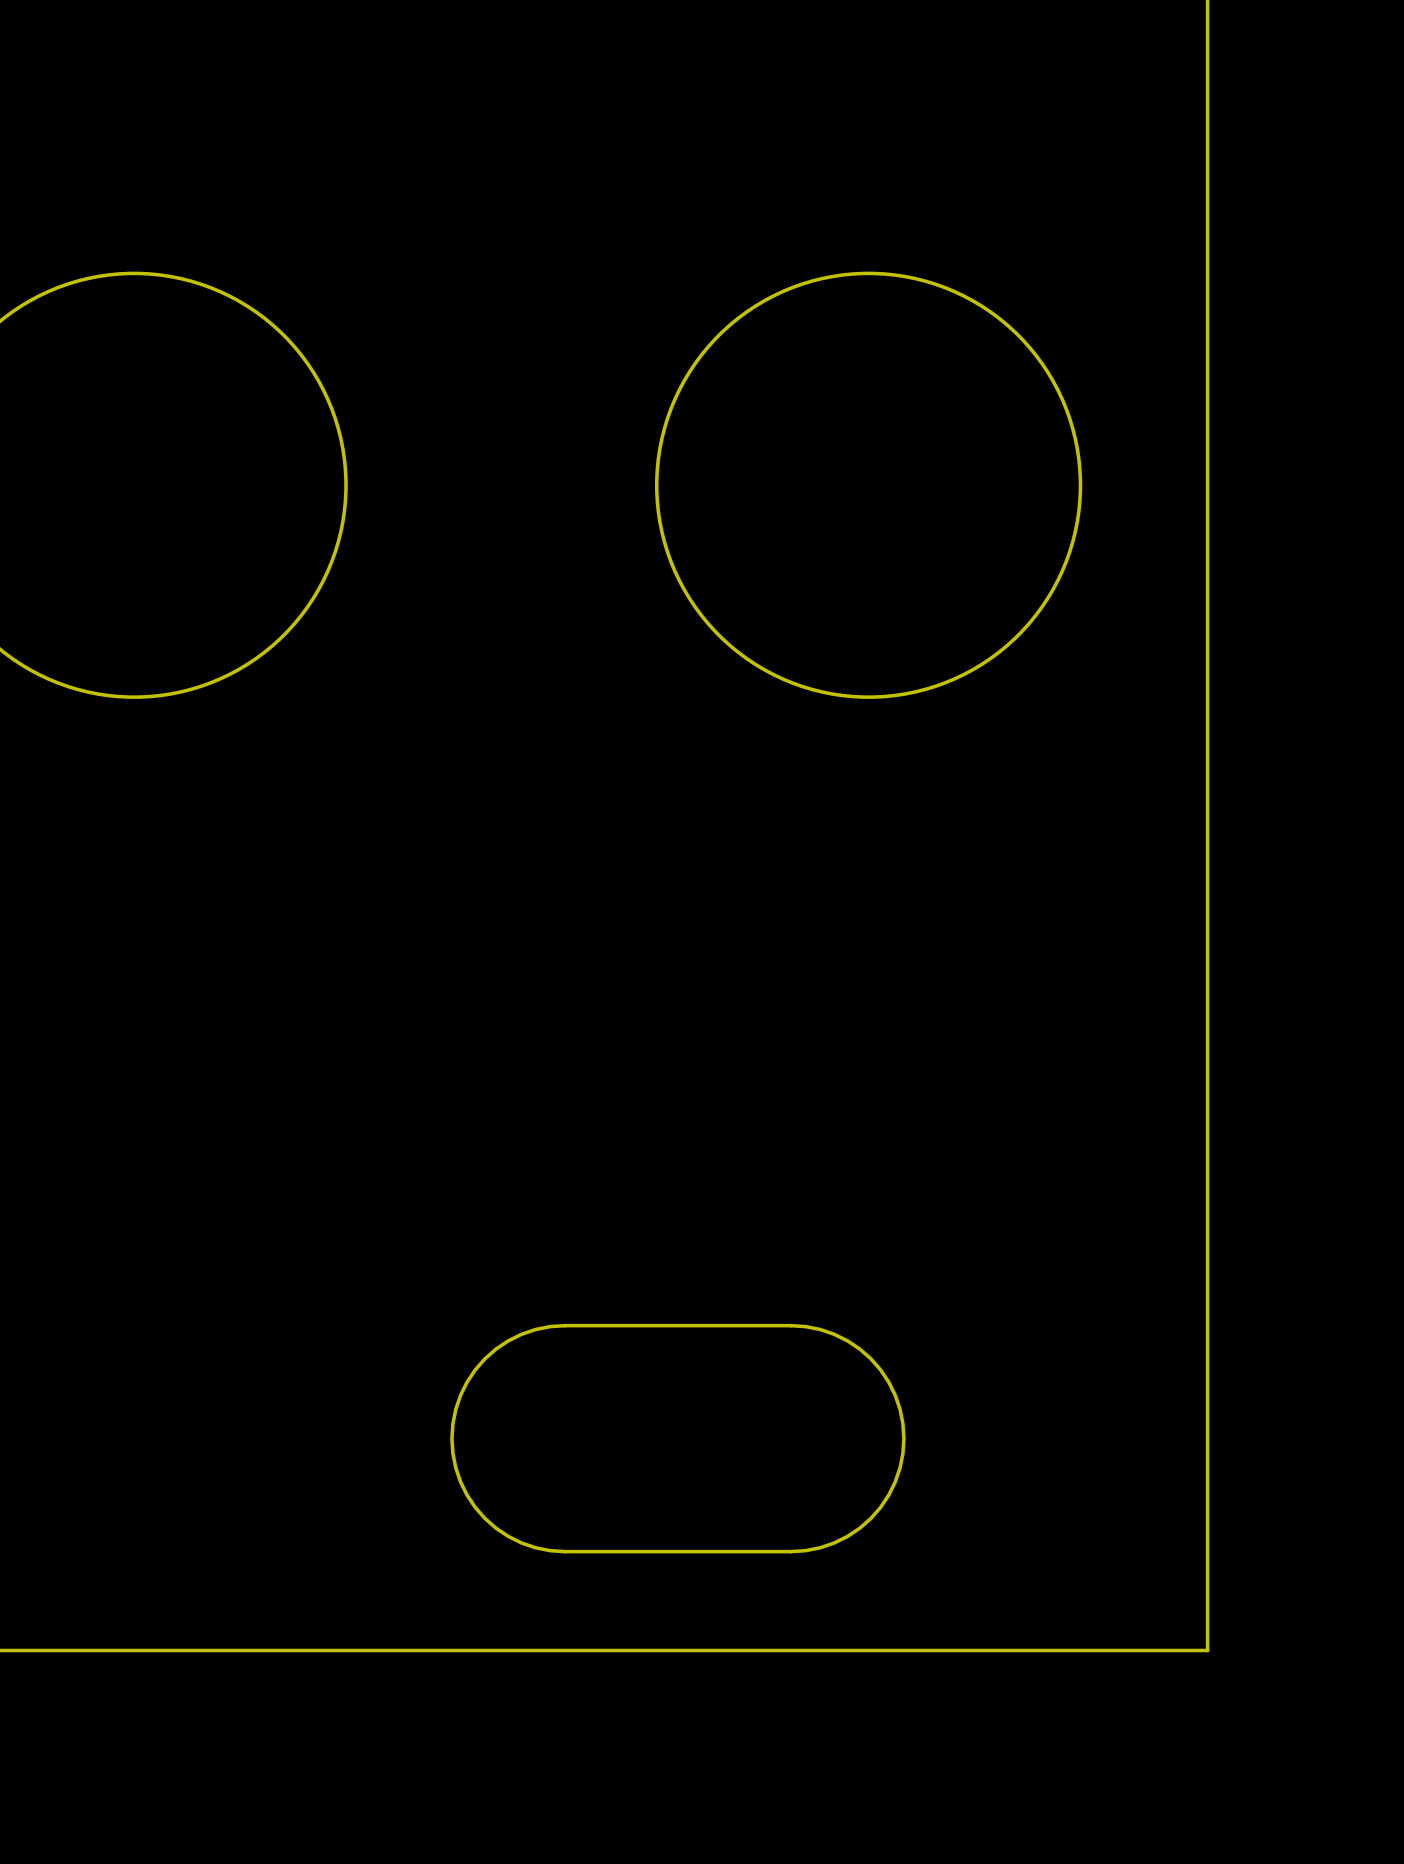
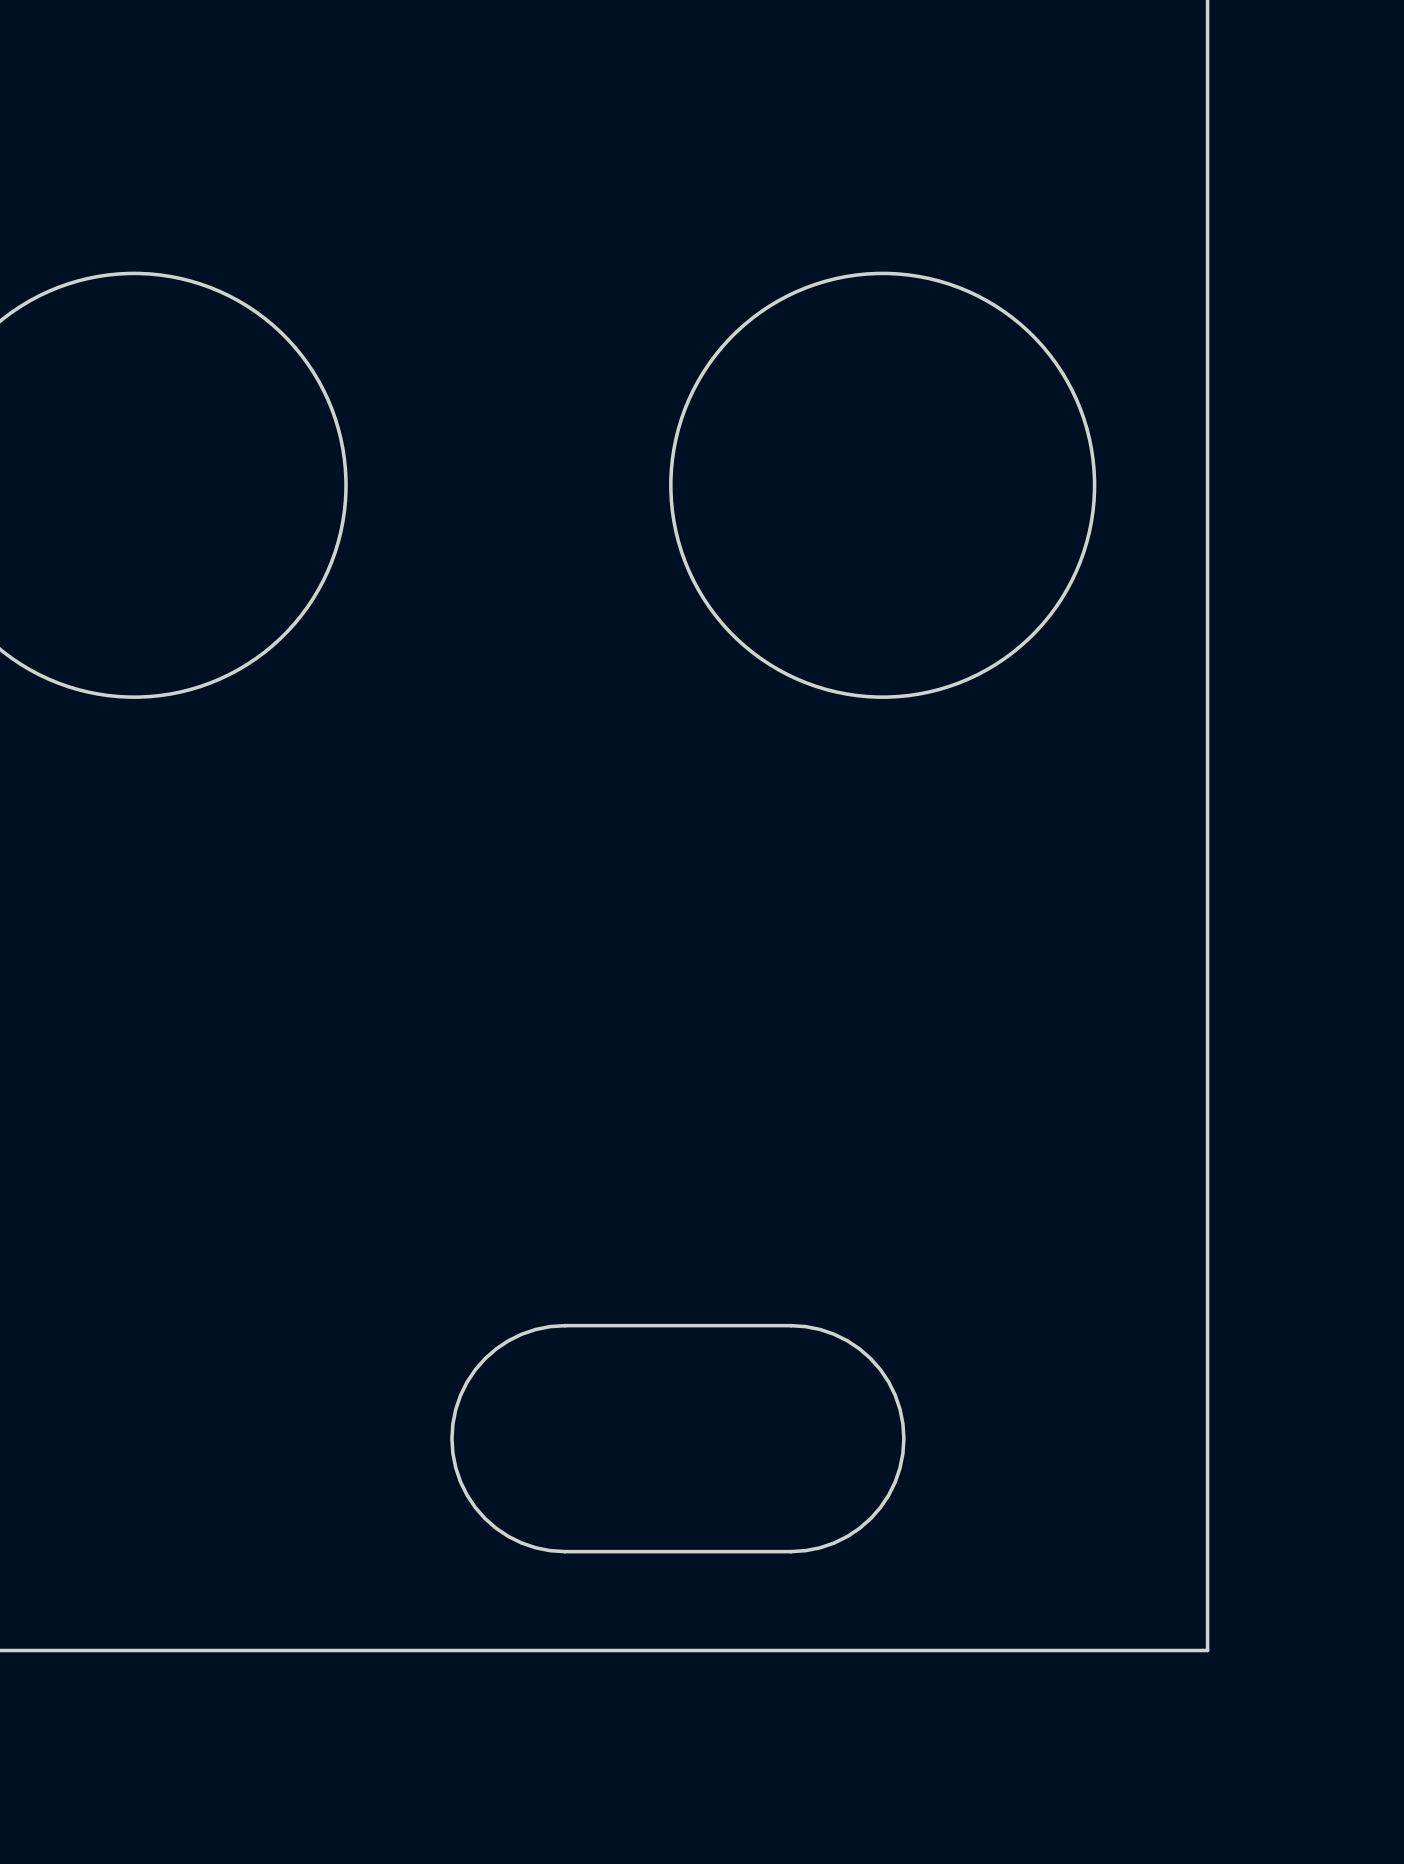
round board edge position: (868, 485) -> (882, 485)

